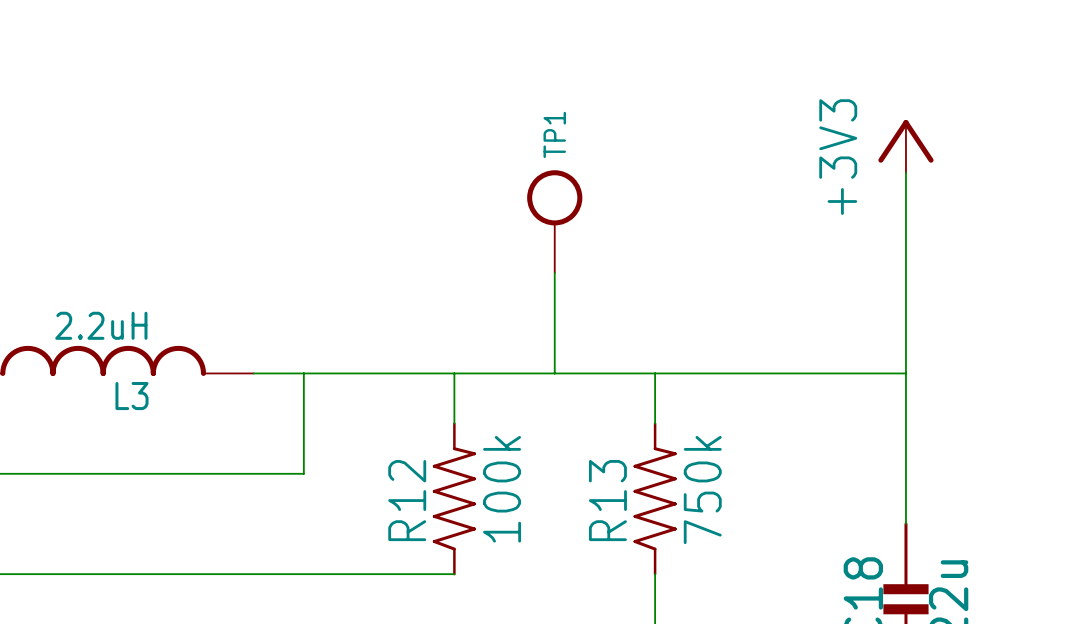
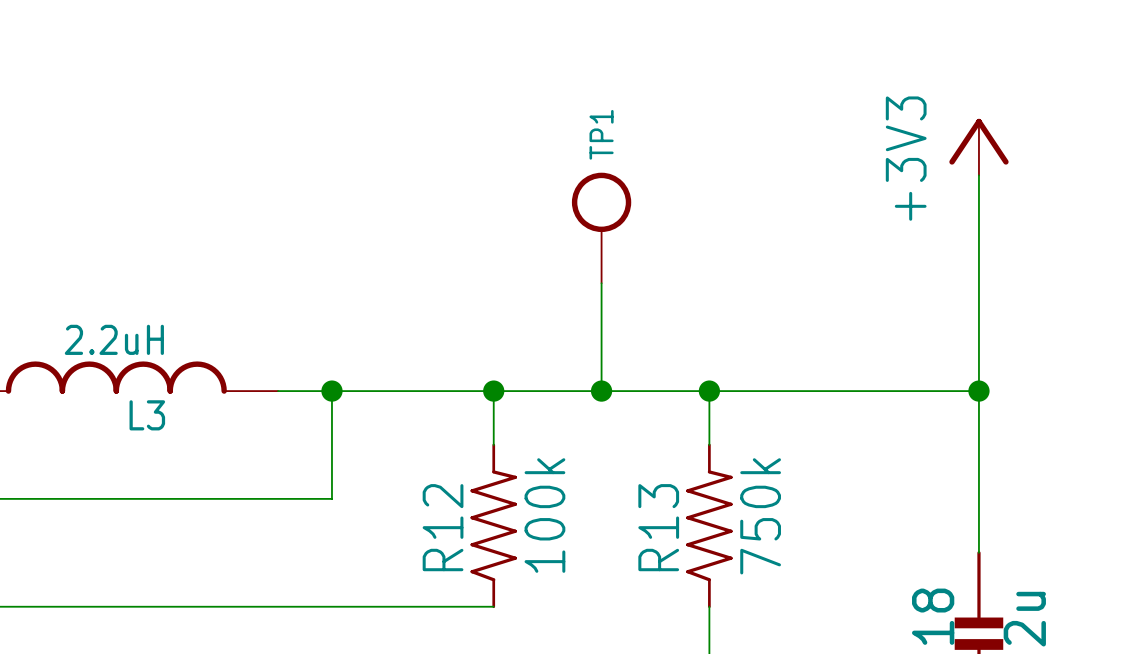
junction: none -> (331, 391)
junction: none -> (493, 391)
junction: none -> (601, 391)
junction: none -> (709, 391)
junction: none -> (978, 391)

